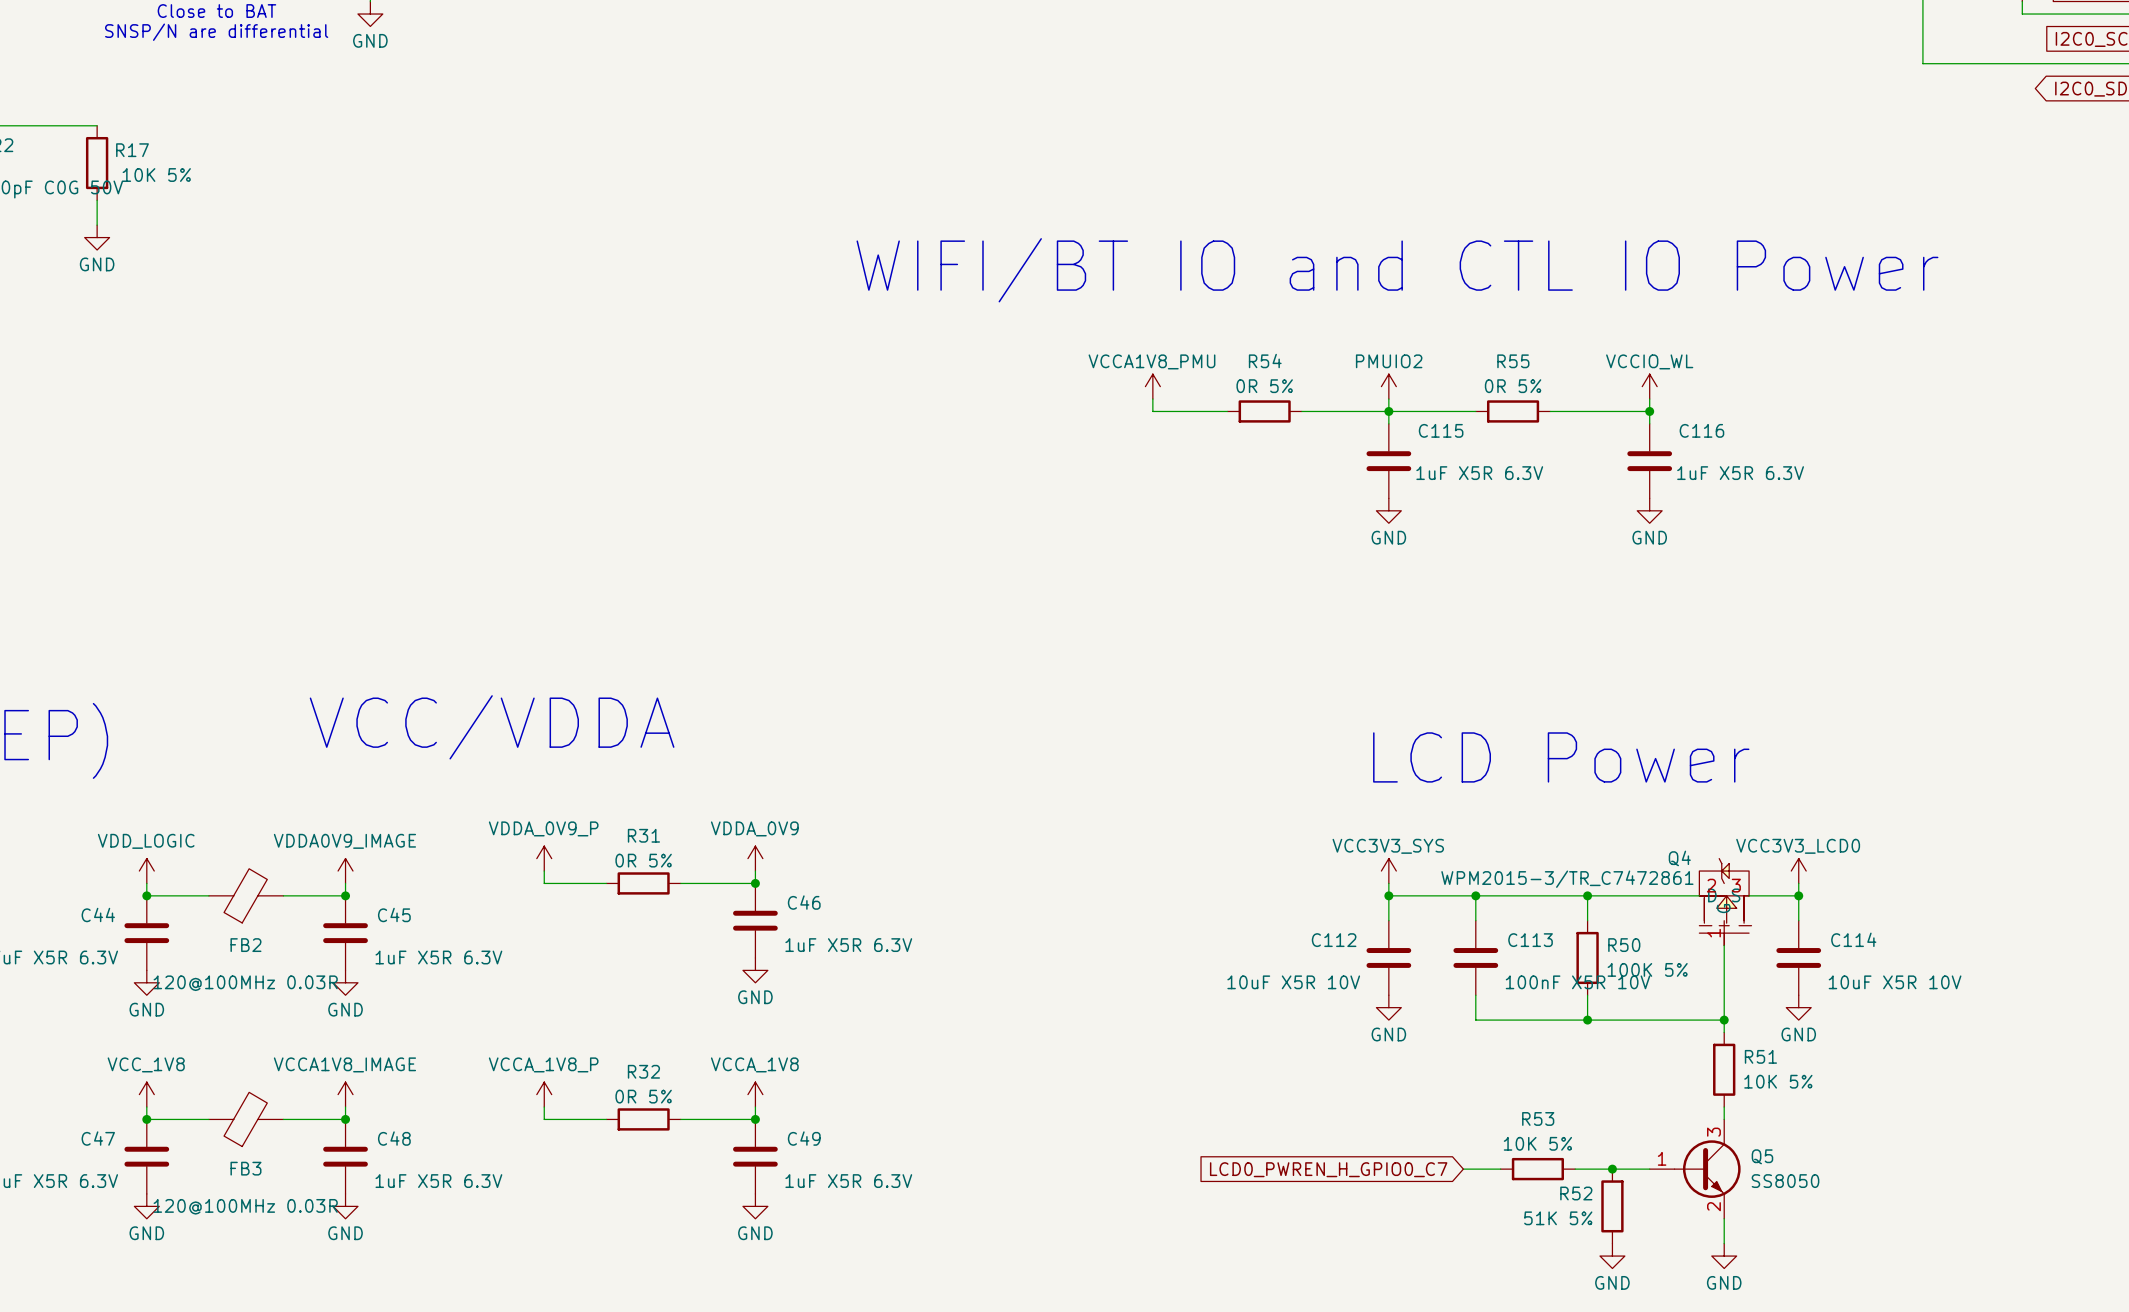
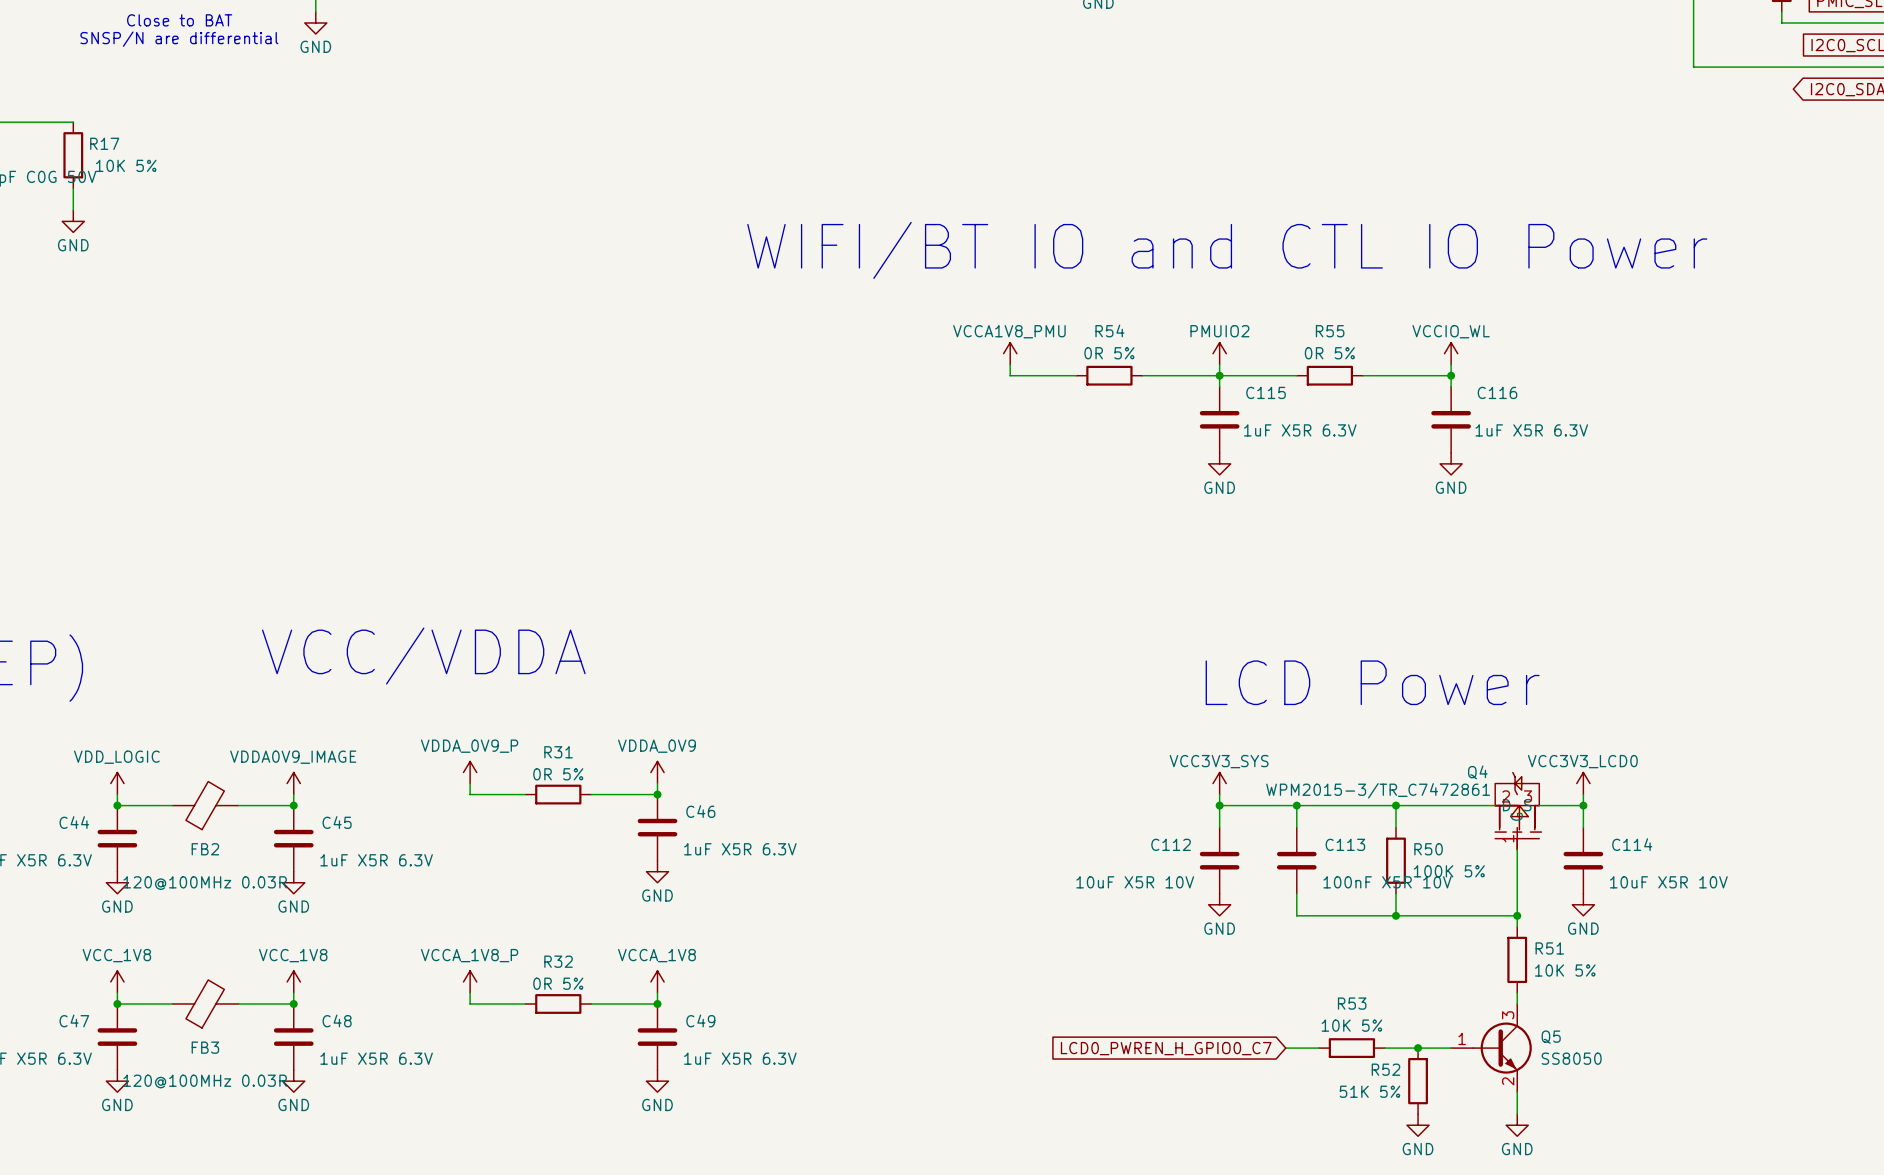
power symbol: VCCA1V8_IMAGE (345, 1094) -> VCC_1V8 (293, 981)

